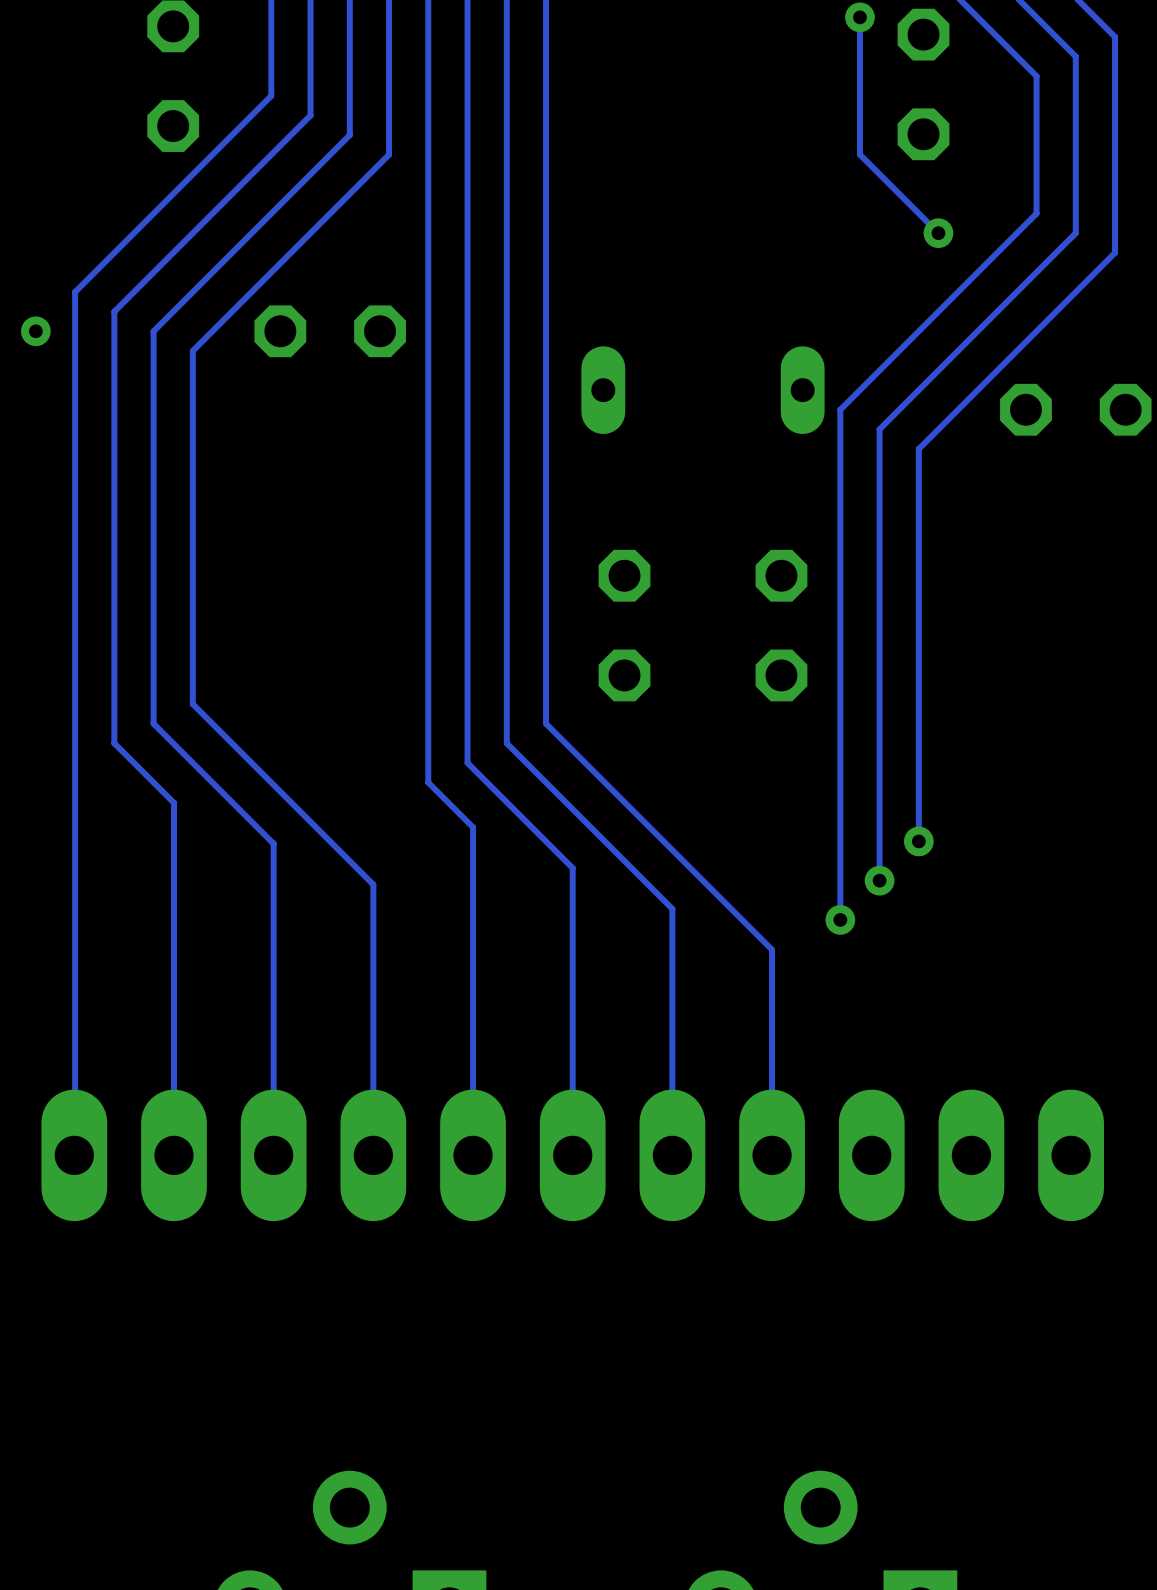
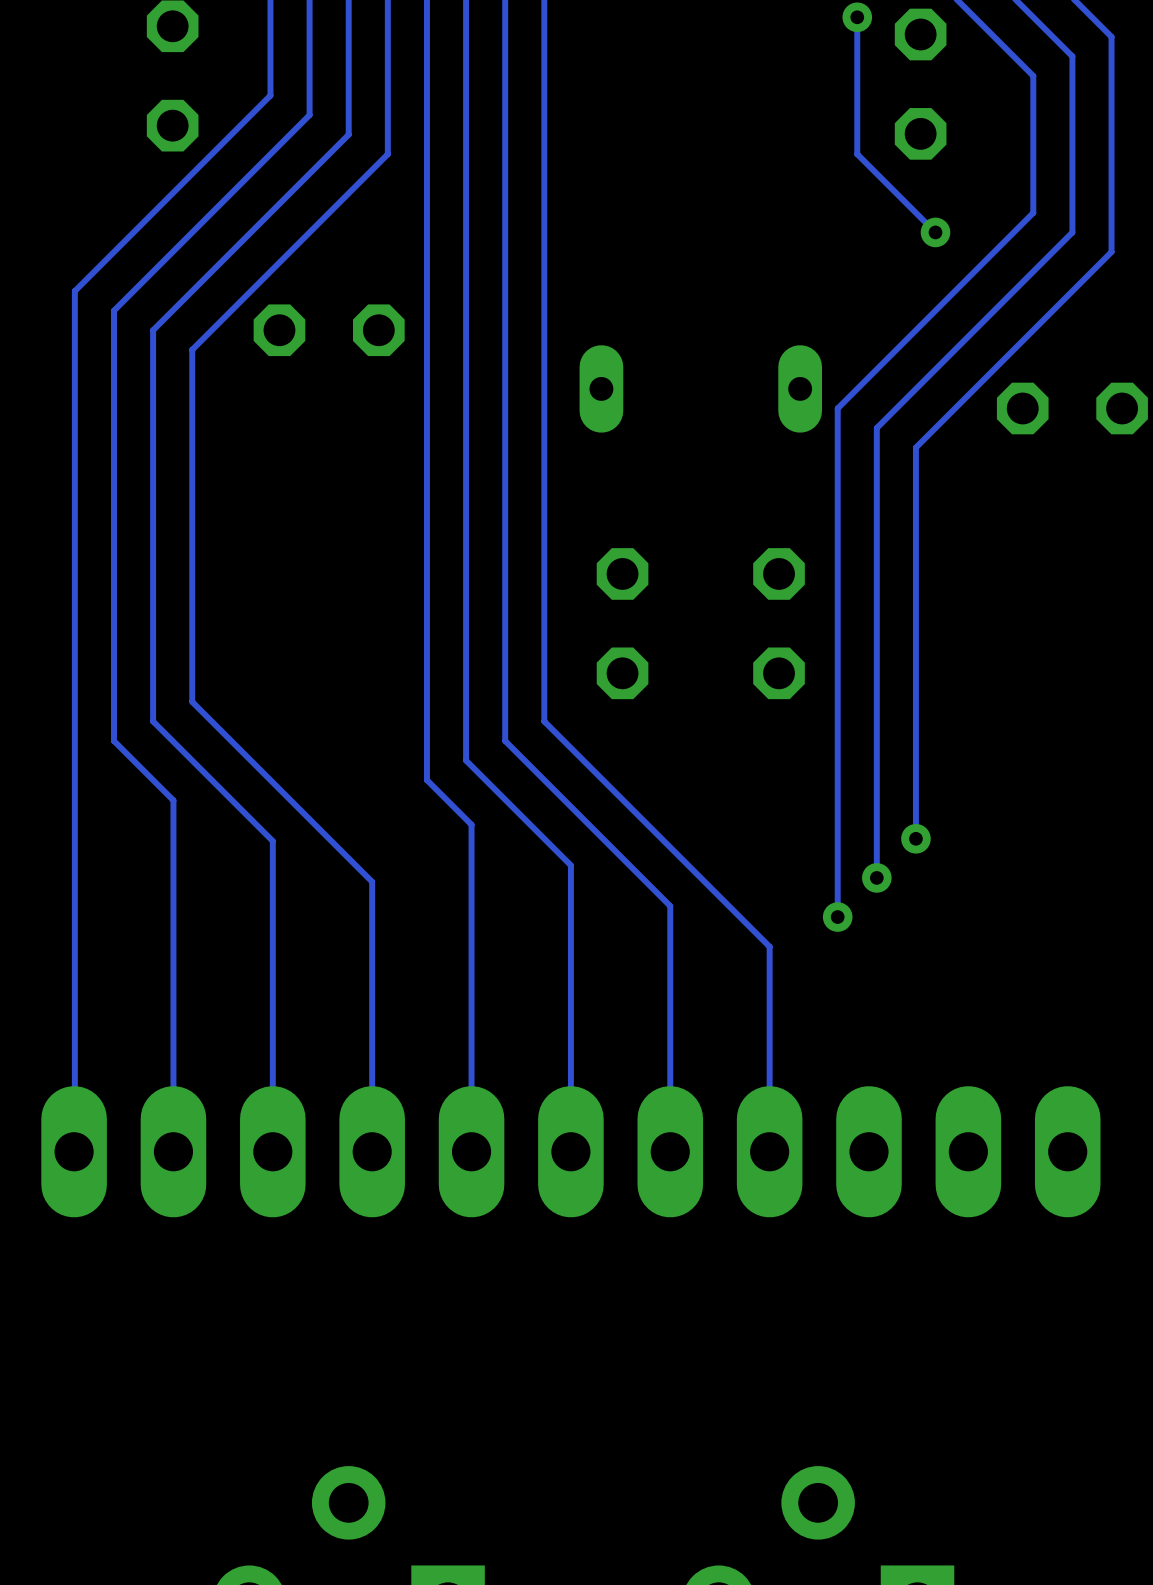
via: (35, 331) -> none

